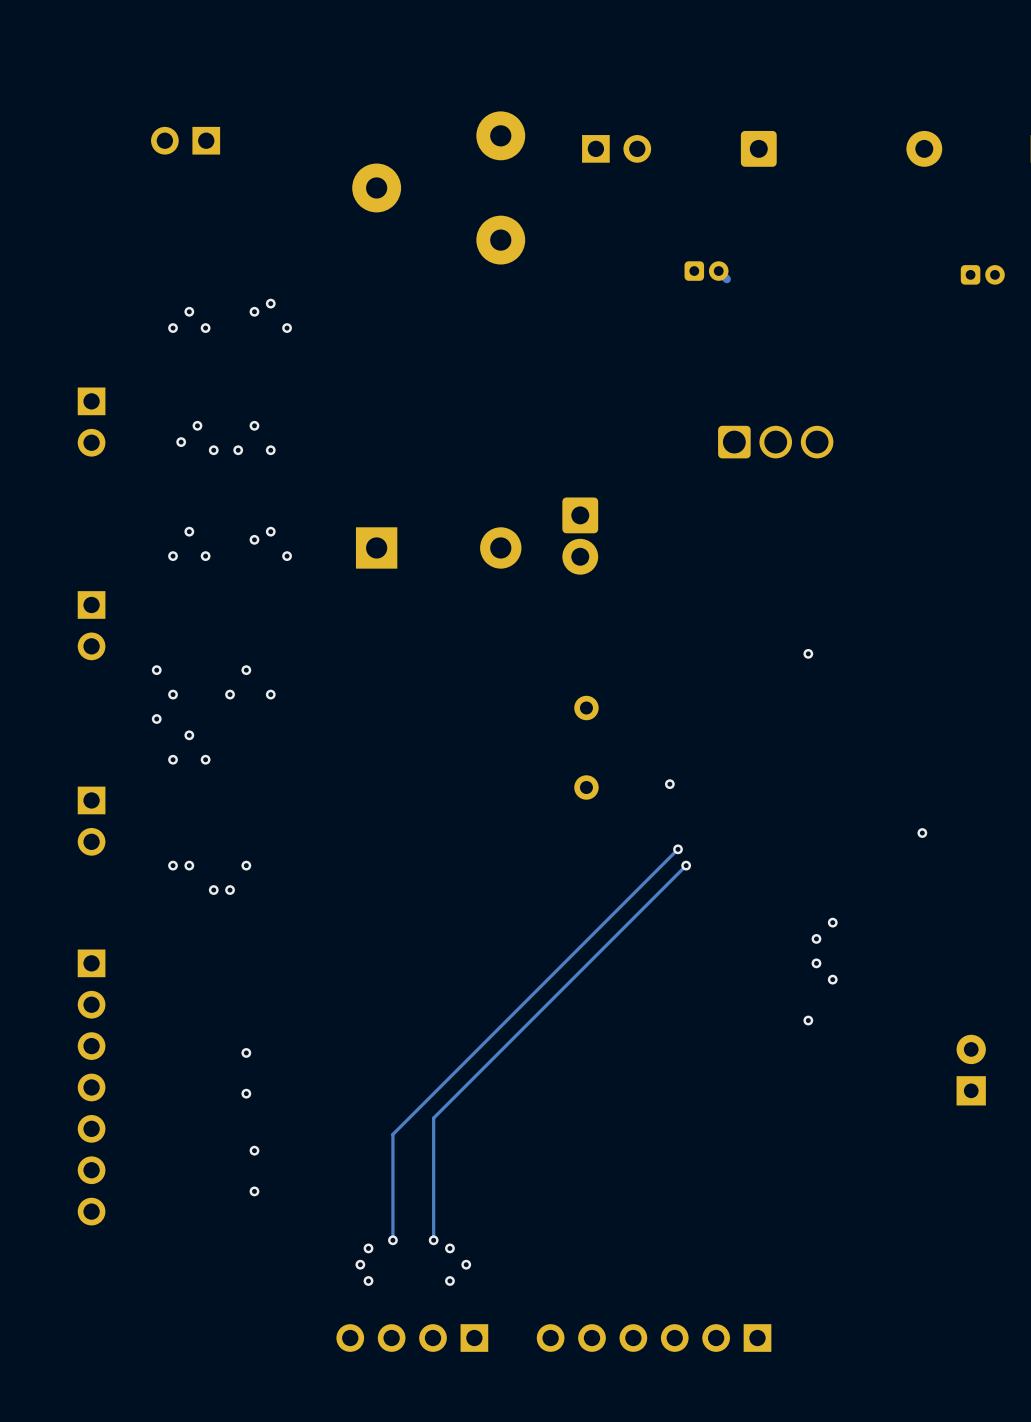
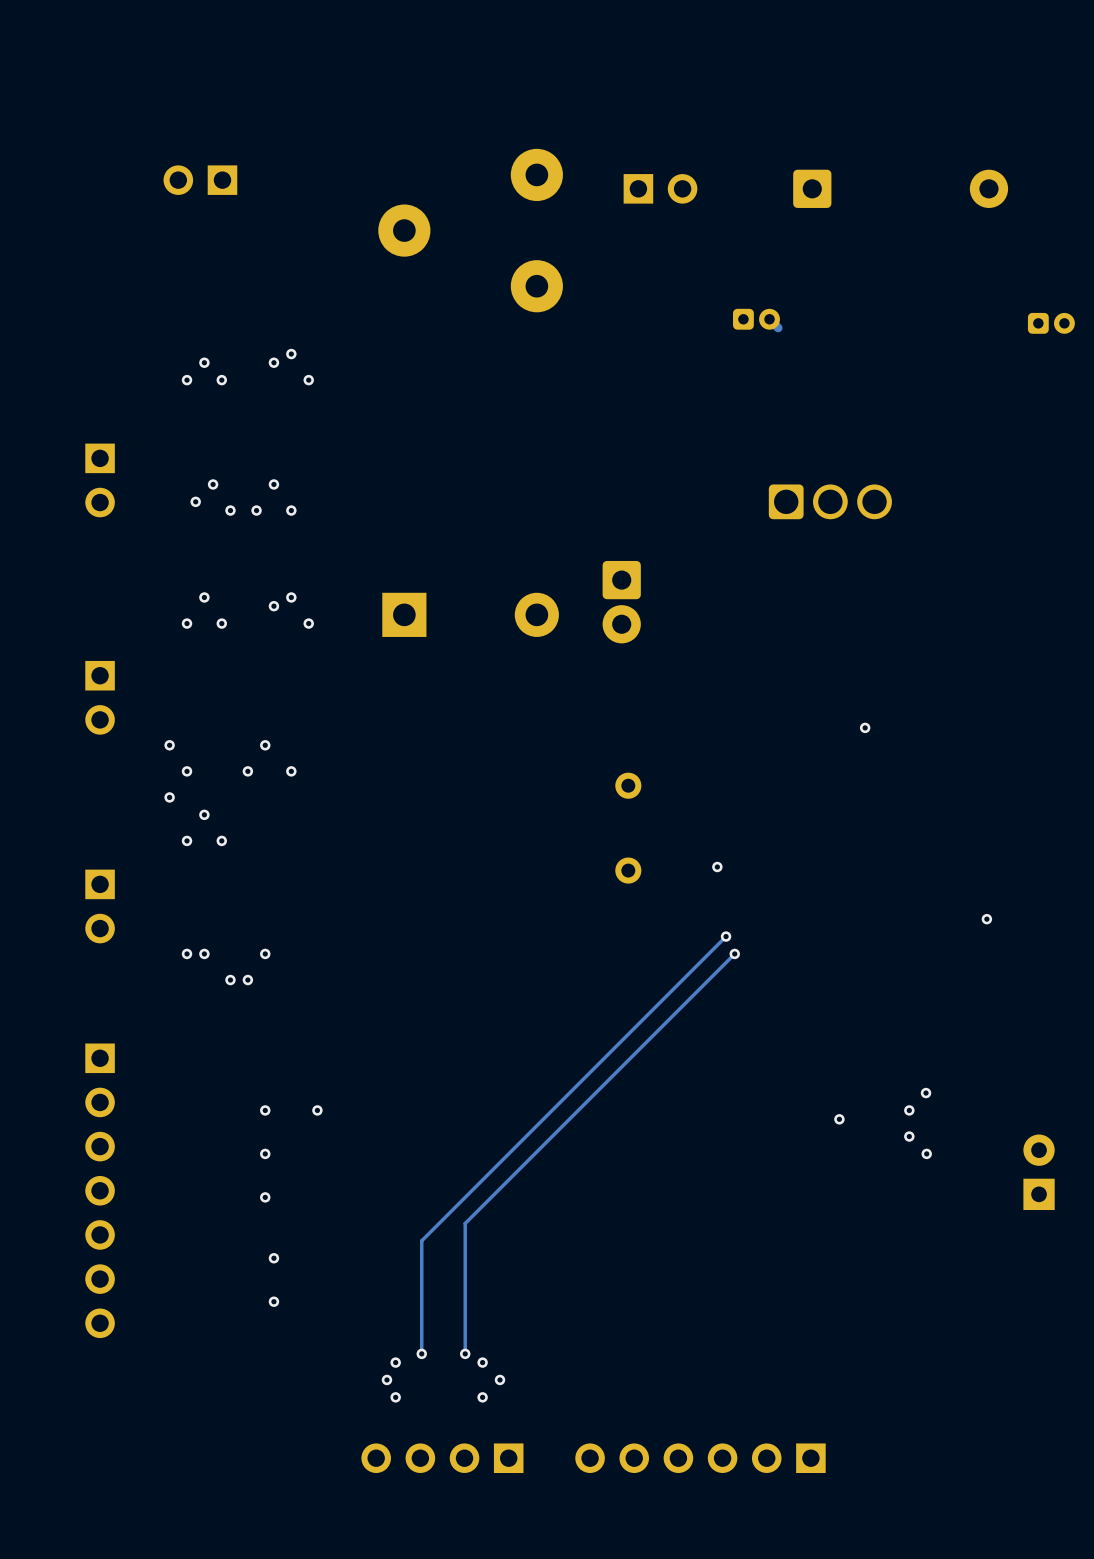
via: (832, 922) -> none
via: (816, 938) -> none
via: (816, 963) -> none
via: (832, 979) -> none
via: none -> (926, 1093)
via: none -> (265, 1110)
via: none -> (317, 1110)
via: none -> (909, 1110)
via: none -> (839, 1119)
via: (808, 1020) -> none
via: none -> (909, 1136)
via: none -> (926, 1153)

